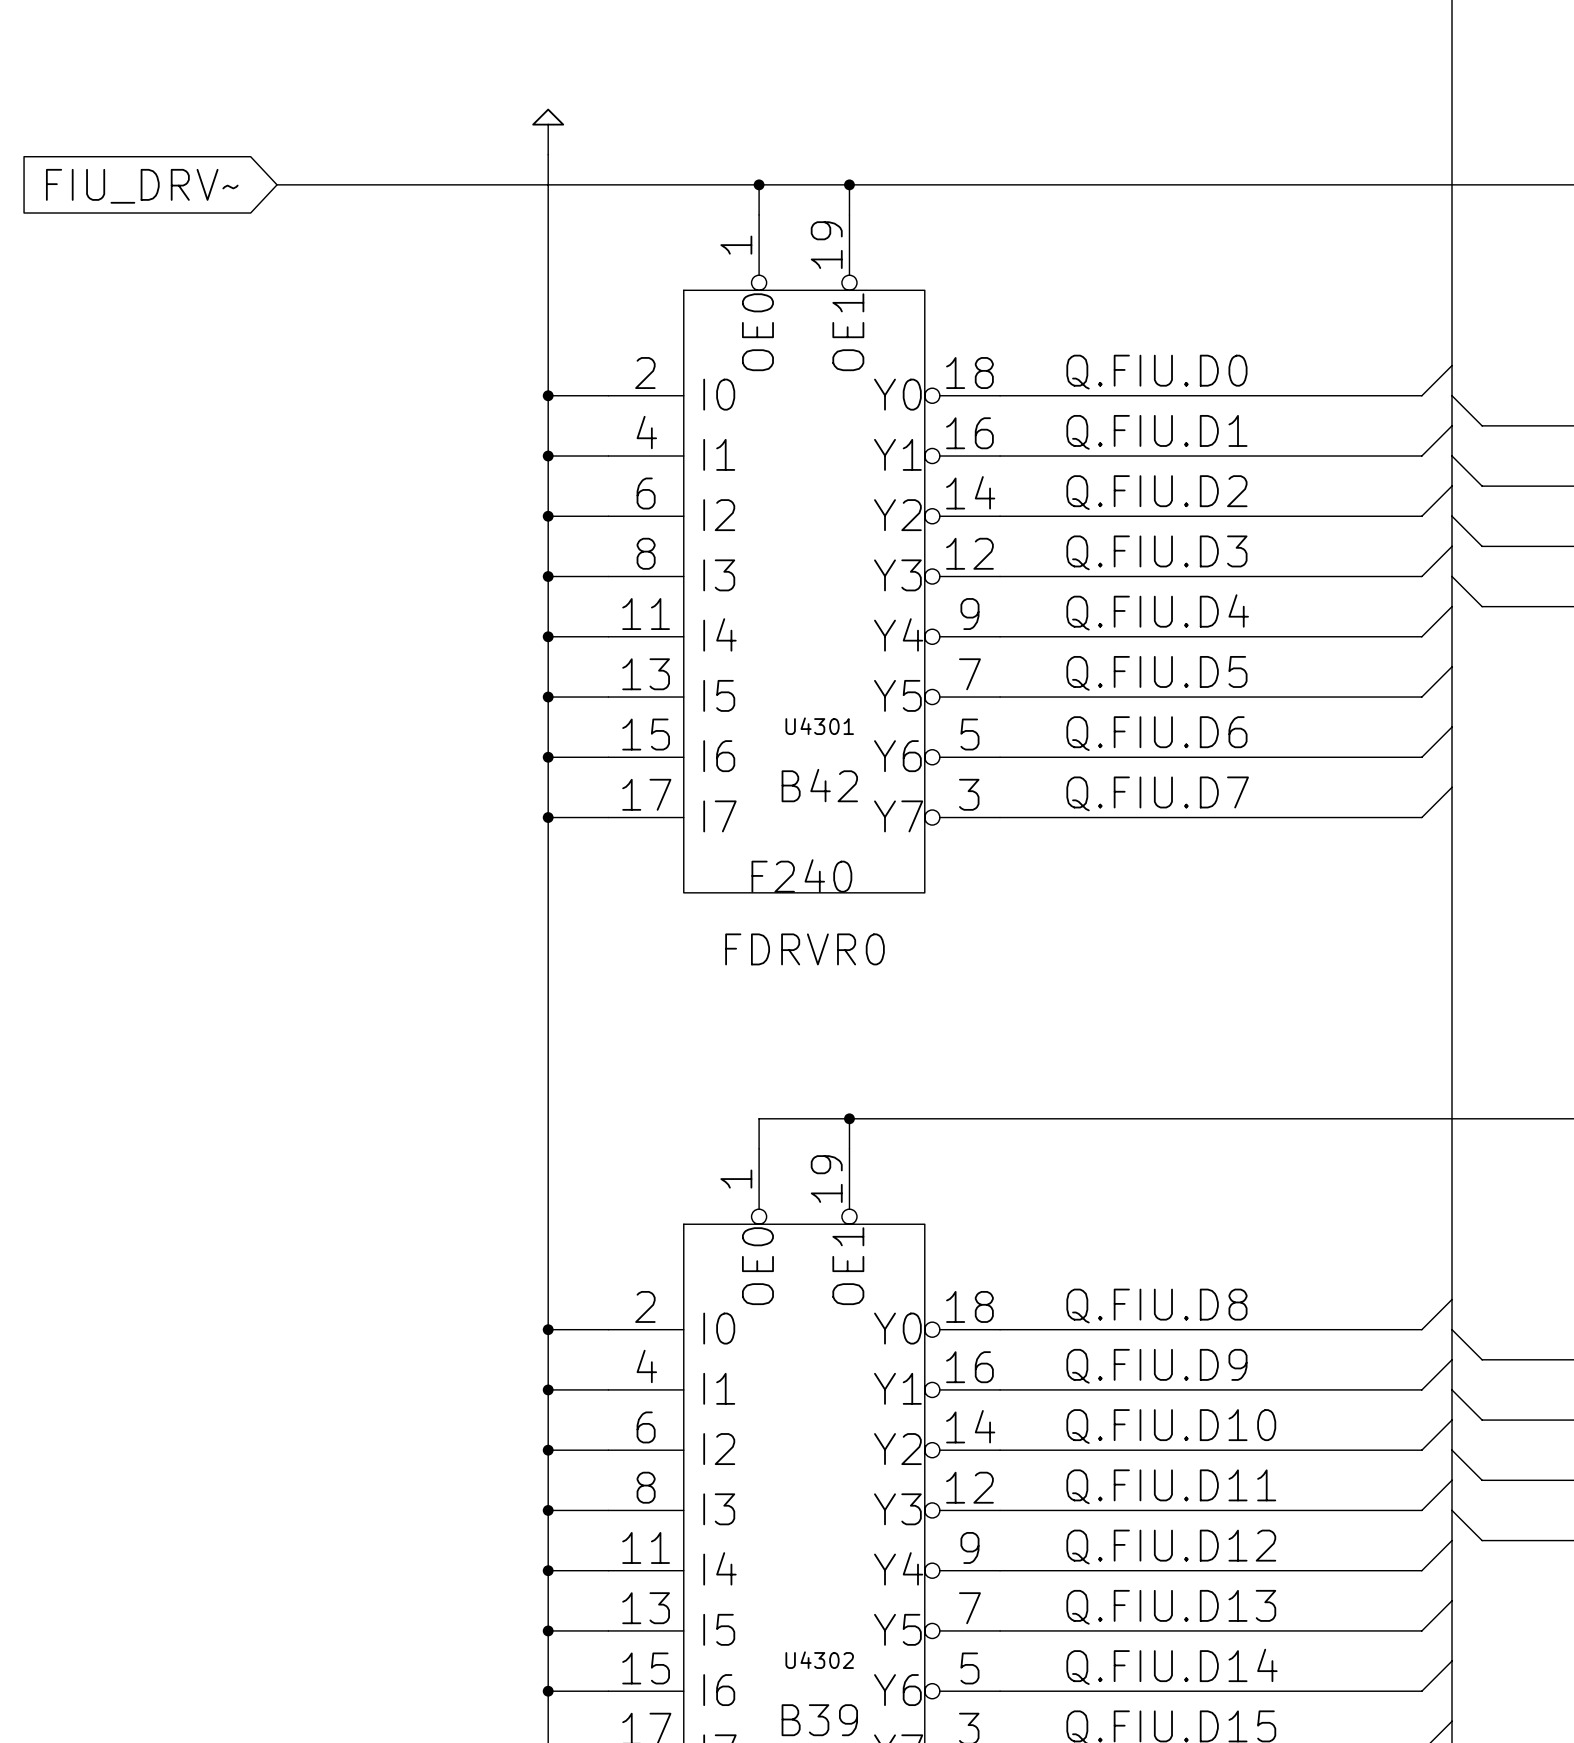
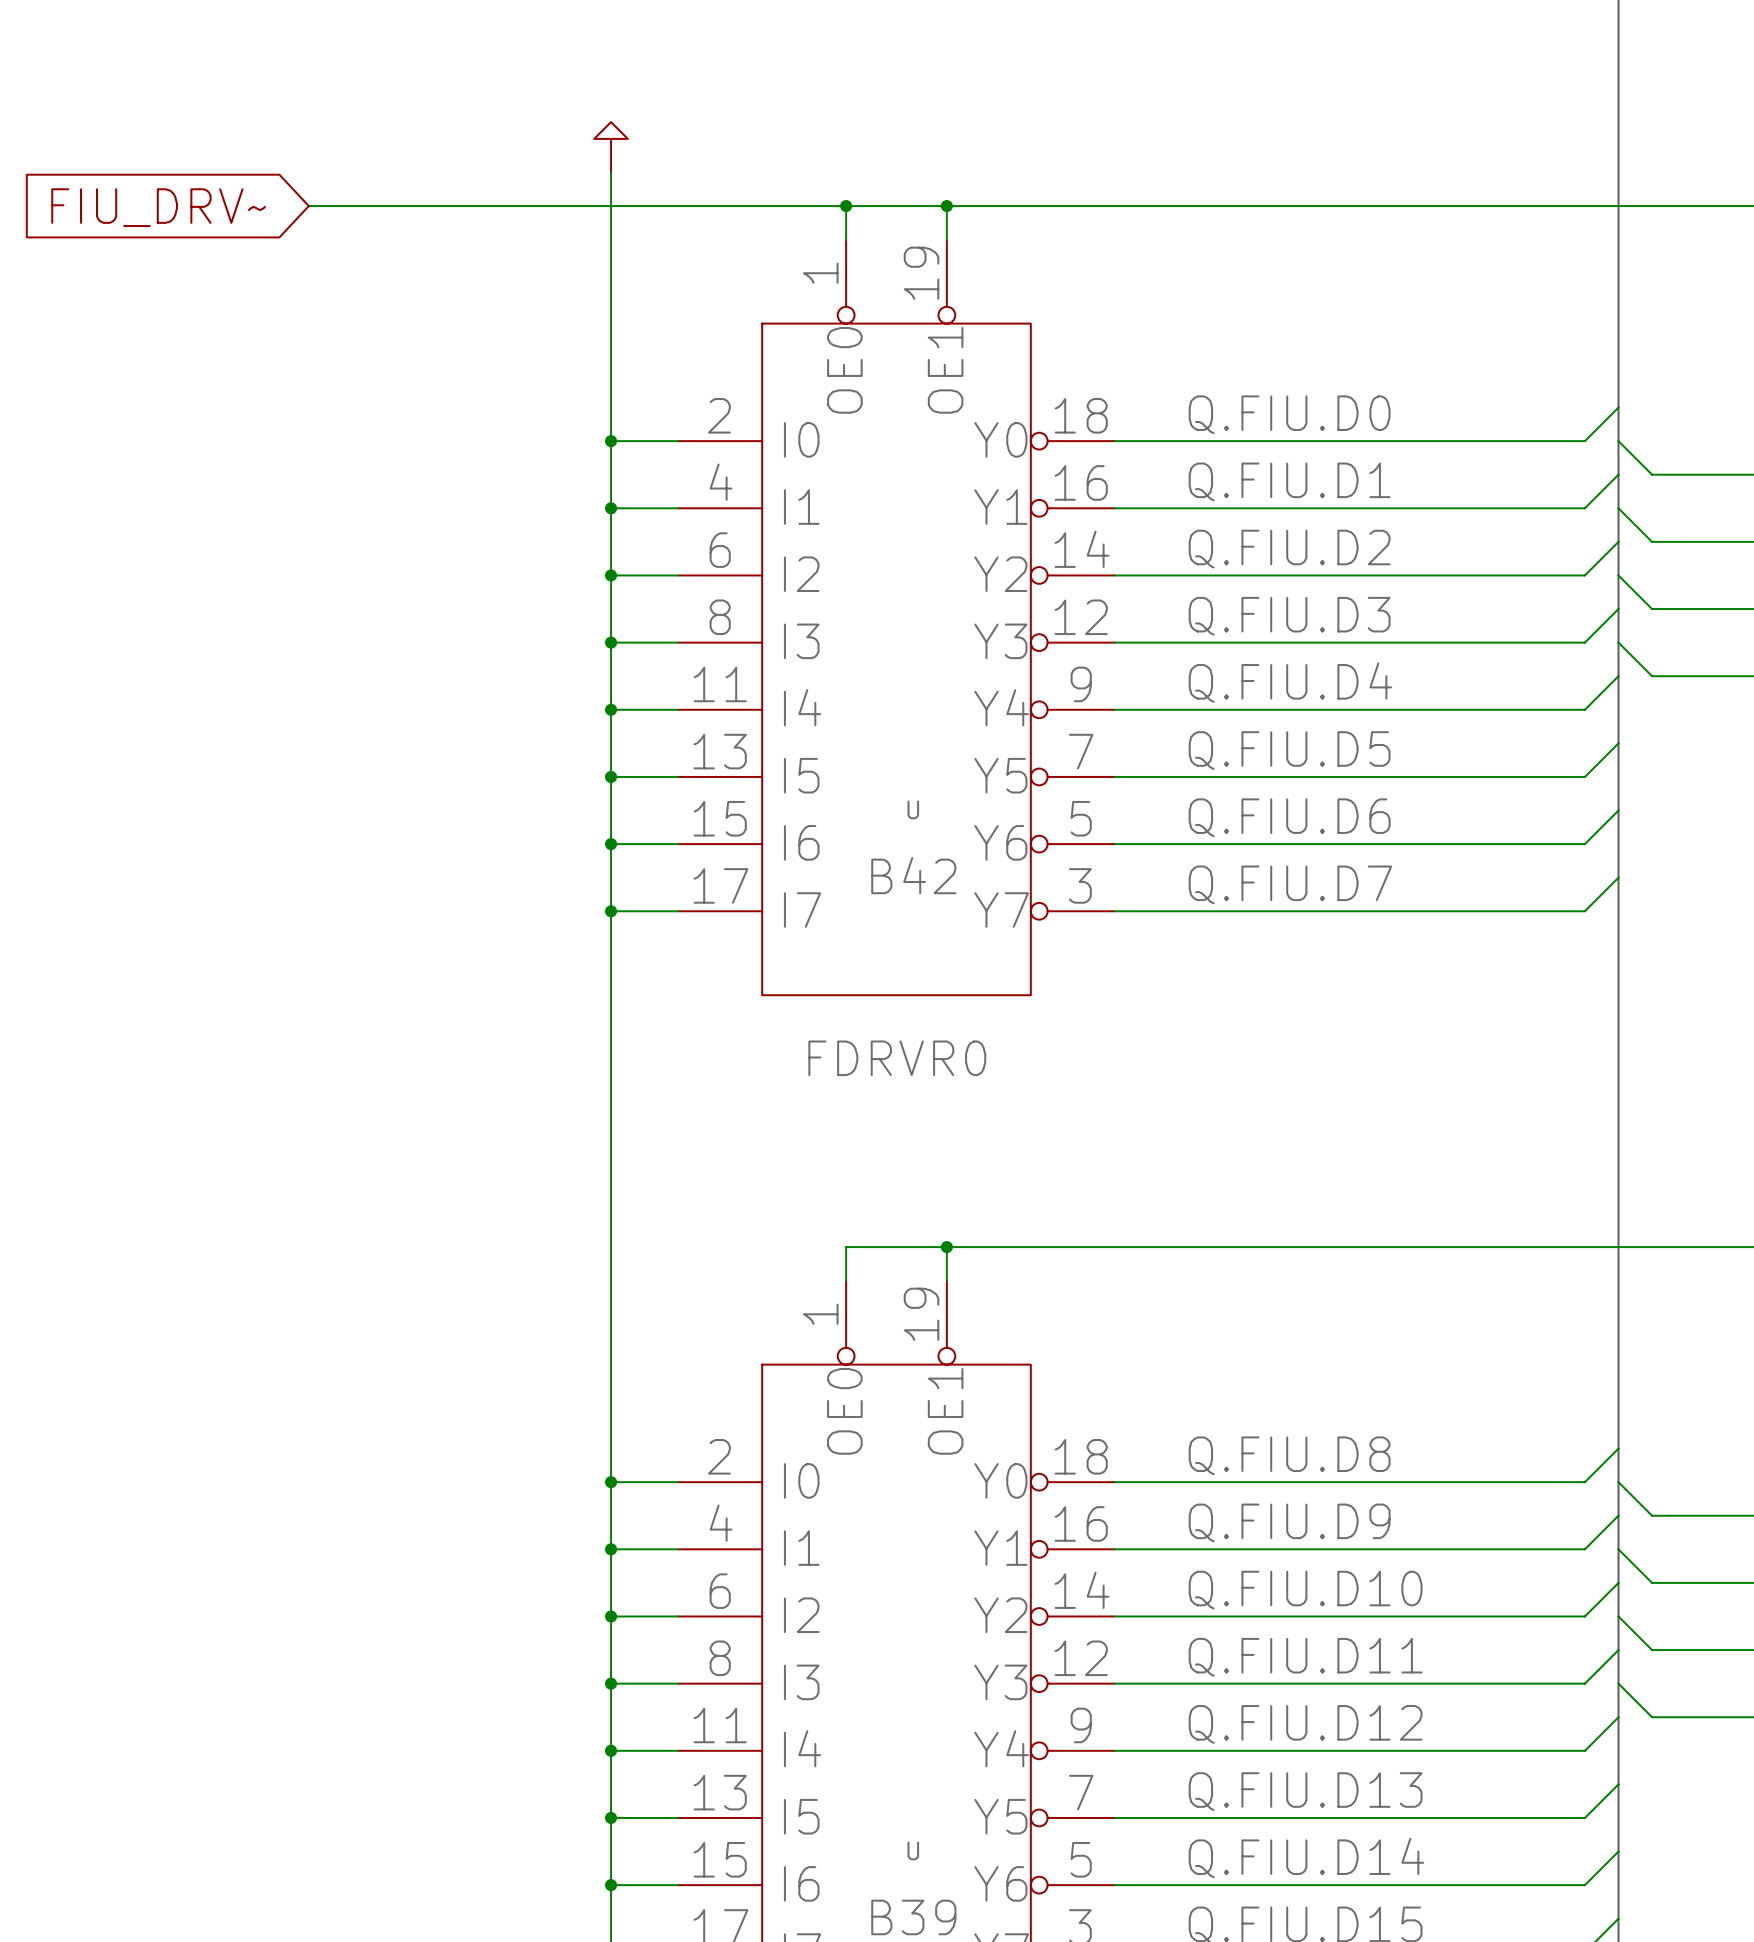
U4301 name: U4301 (819, 726) -> U (913, 809)
U4301 value: F240 (801, 875) -> none
U4302 name: U4302 (819, 1660) -> U (913, 1850)

